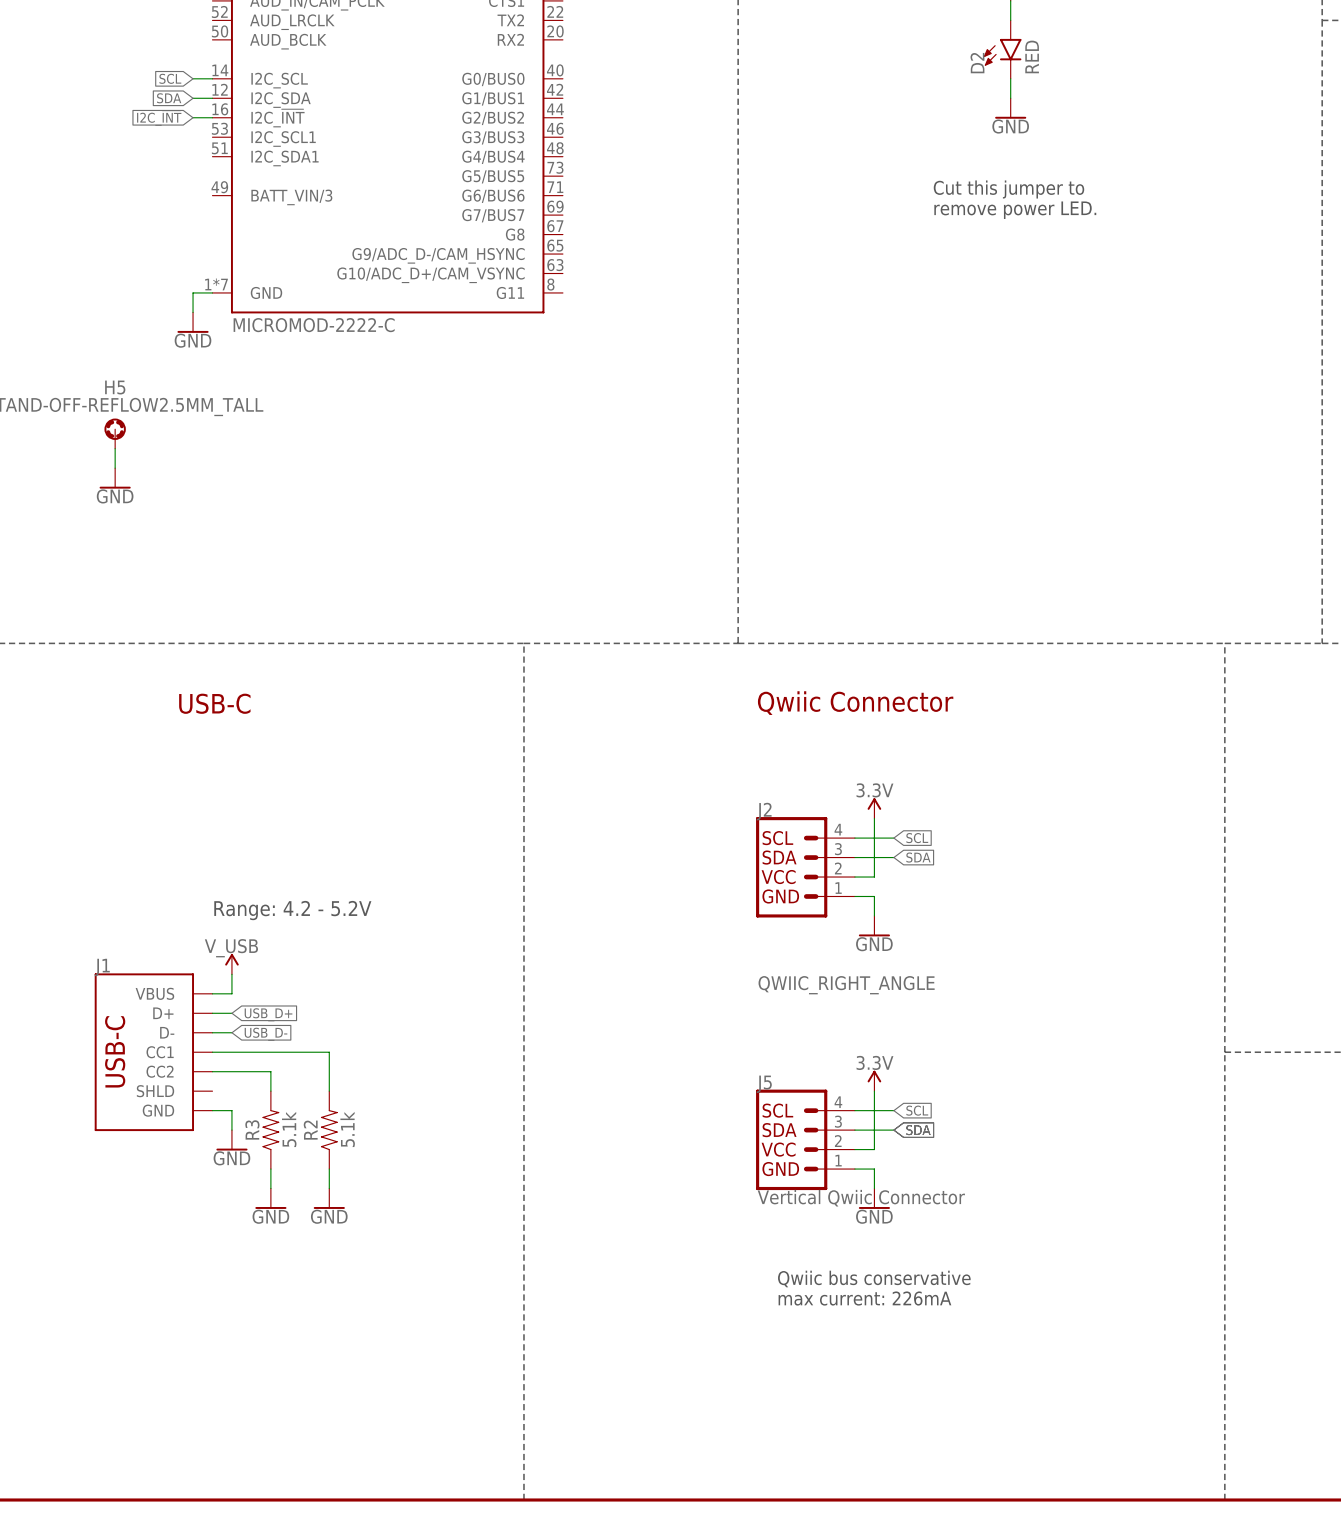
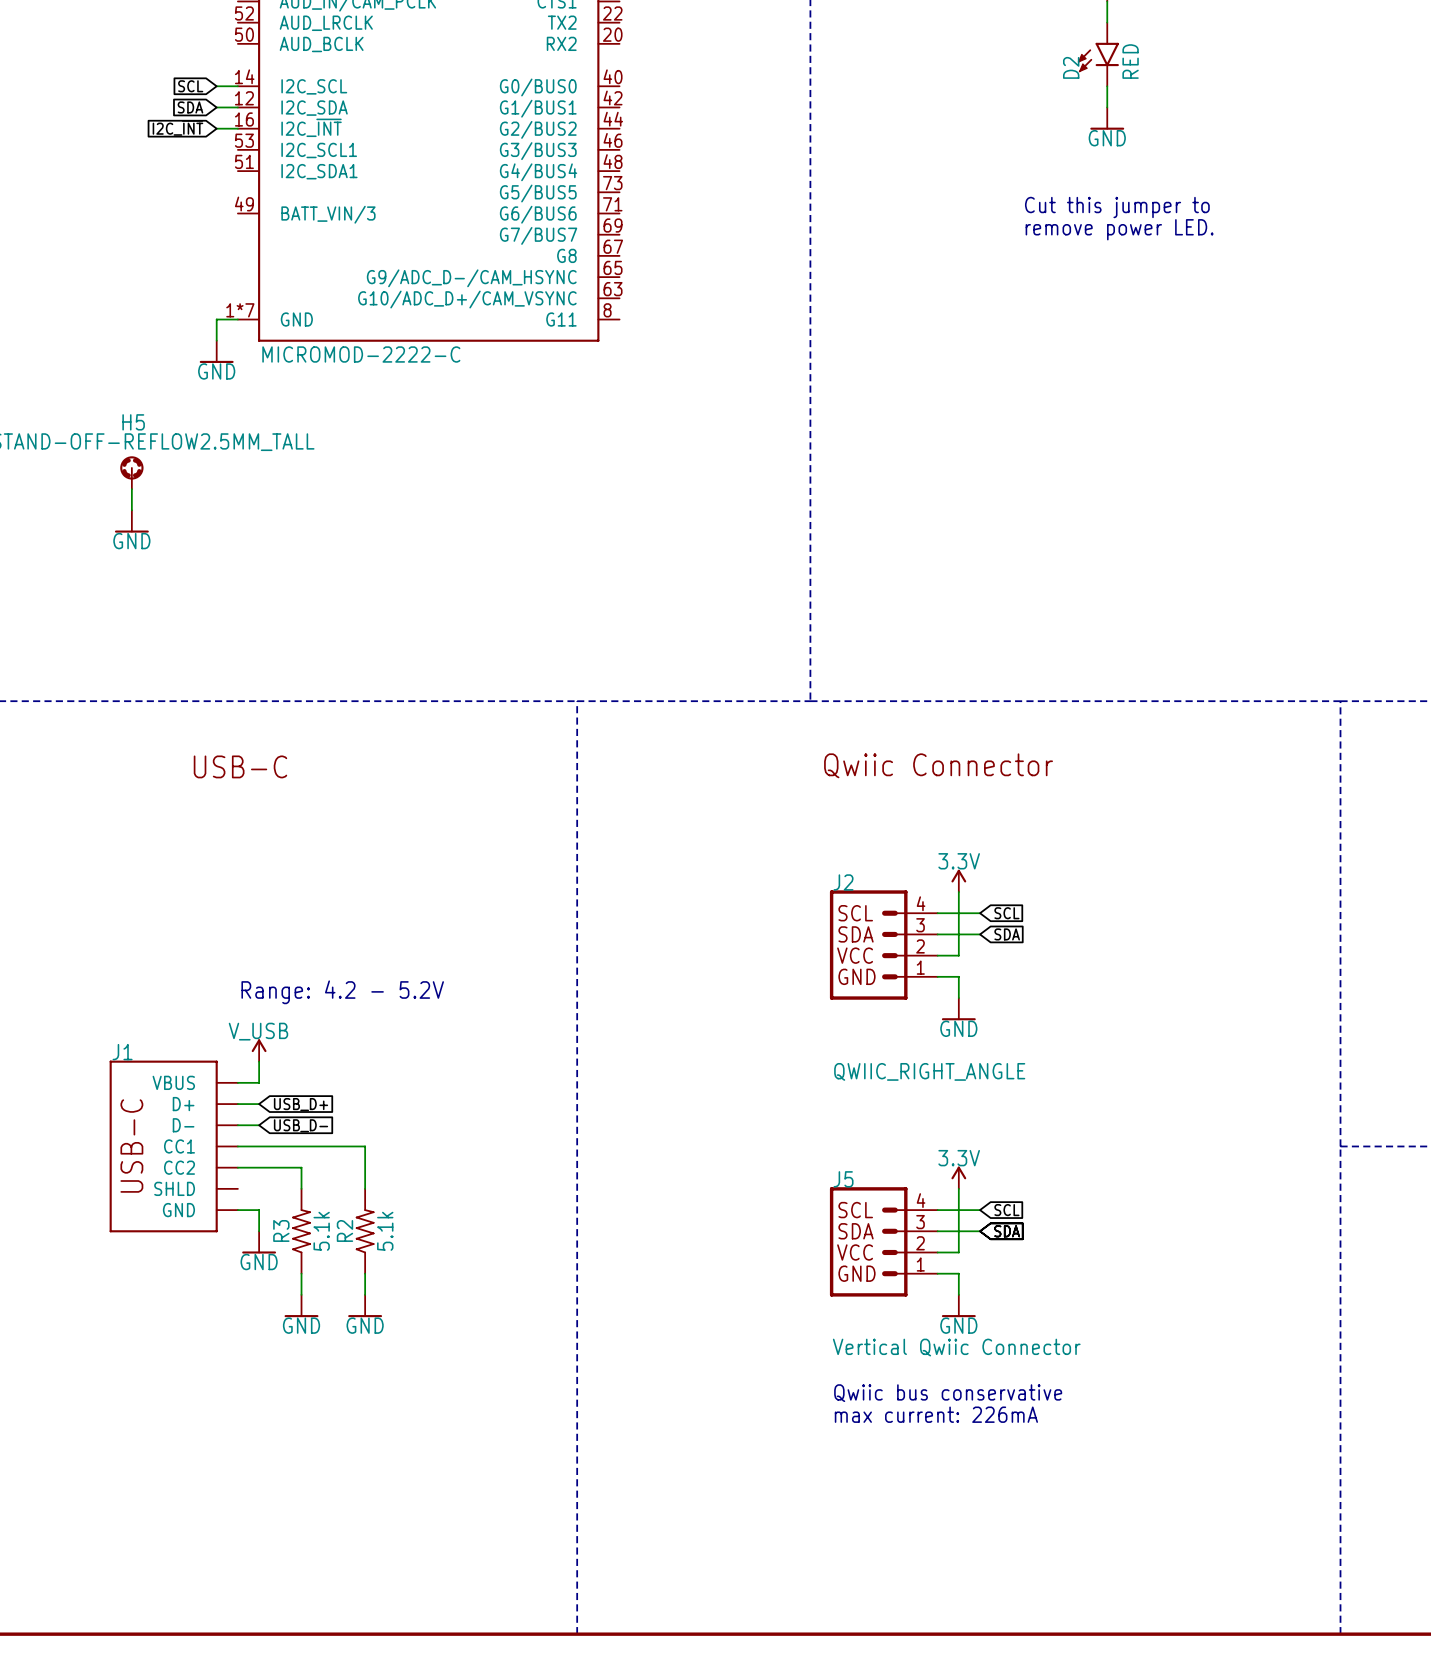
J5 value position: Vertical Qwiic Connector (861, 1198) -> Vertical Qwiic Connector (956, 1347)
text position: Qwiic bus conservative (874, 1278) -> Qwiic bus conservative (948, 1393)
text position: max current: 226mA (864, 1298) -> max current: 226mA (936, 1414)

